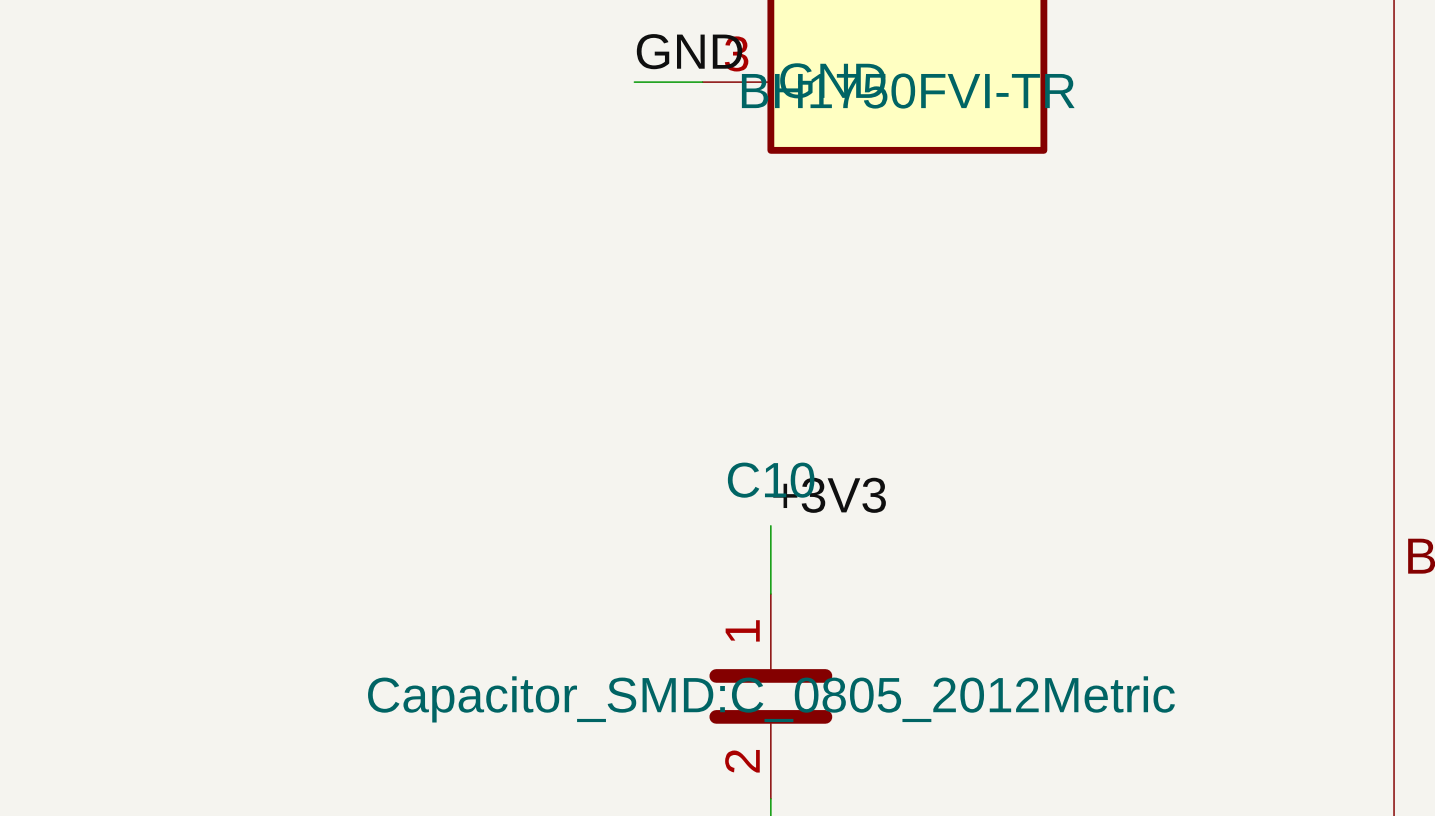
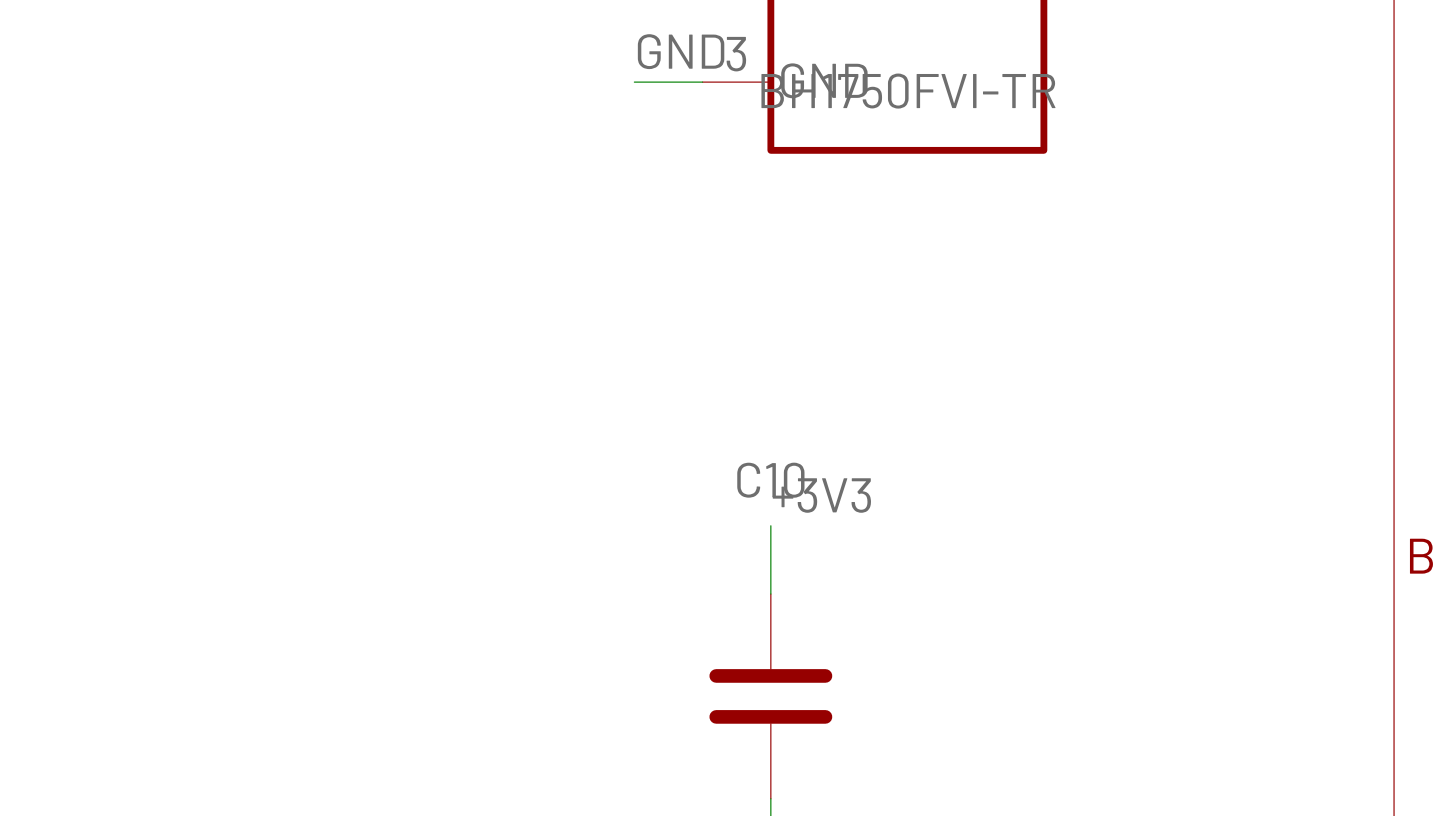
C10 pin number: 1 (742, 630) -> none
C10 text: Capacitor_SMD:C_0805_2012Metric (771, 699) -> none
C10 pin number: 2 (742, 761) -> none

